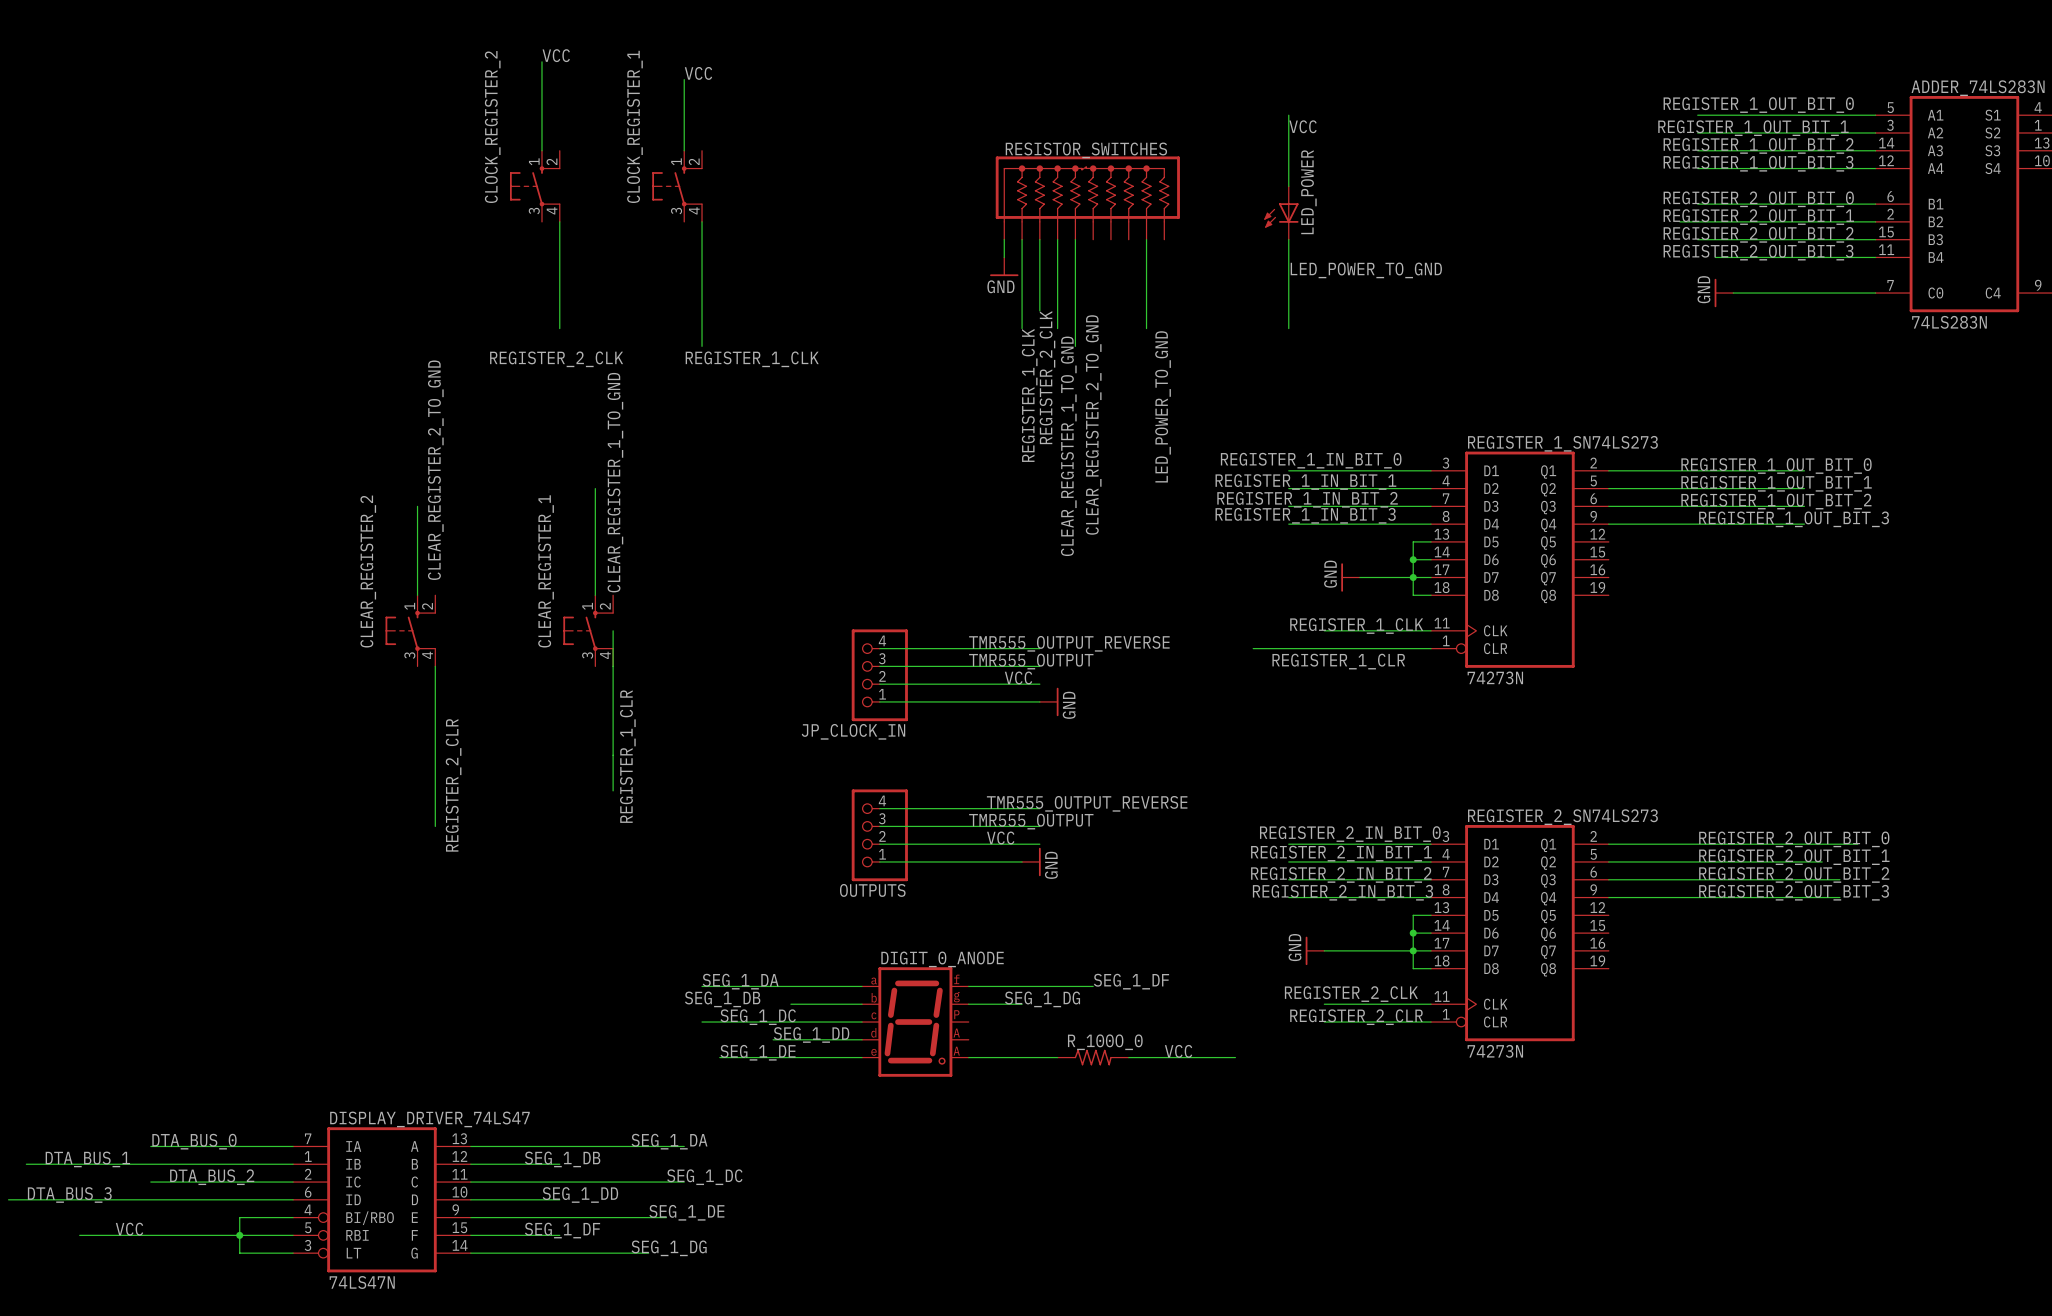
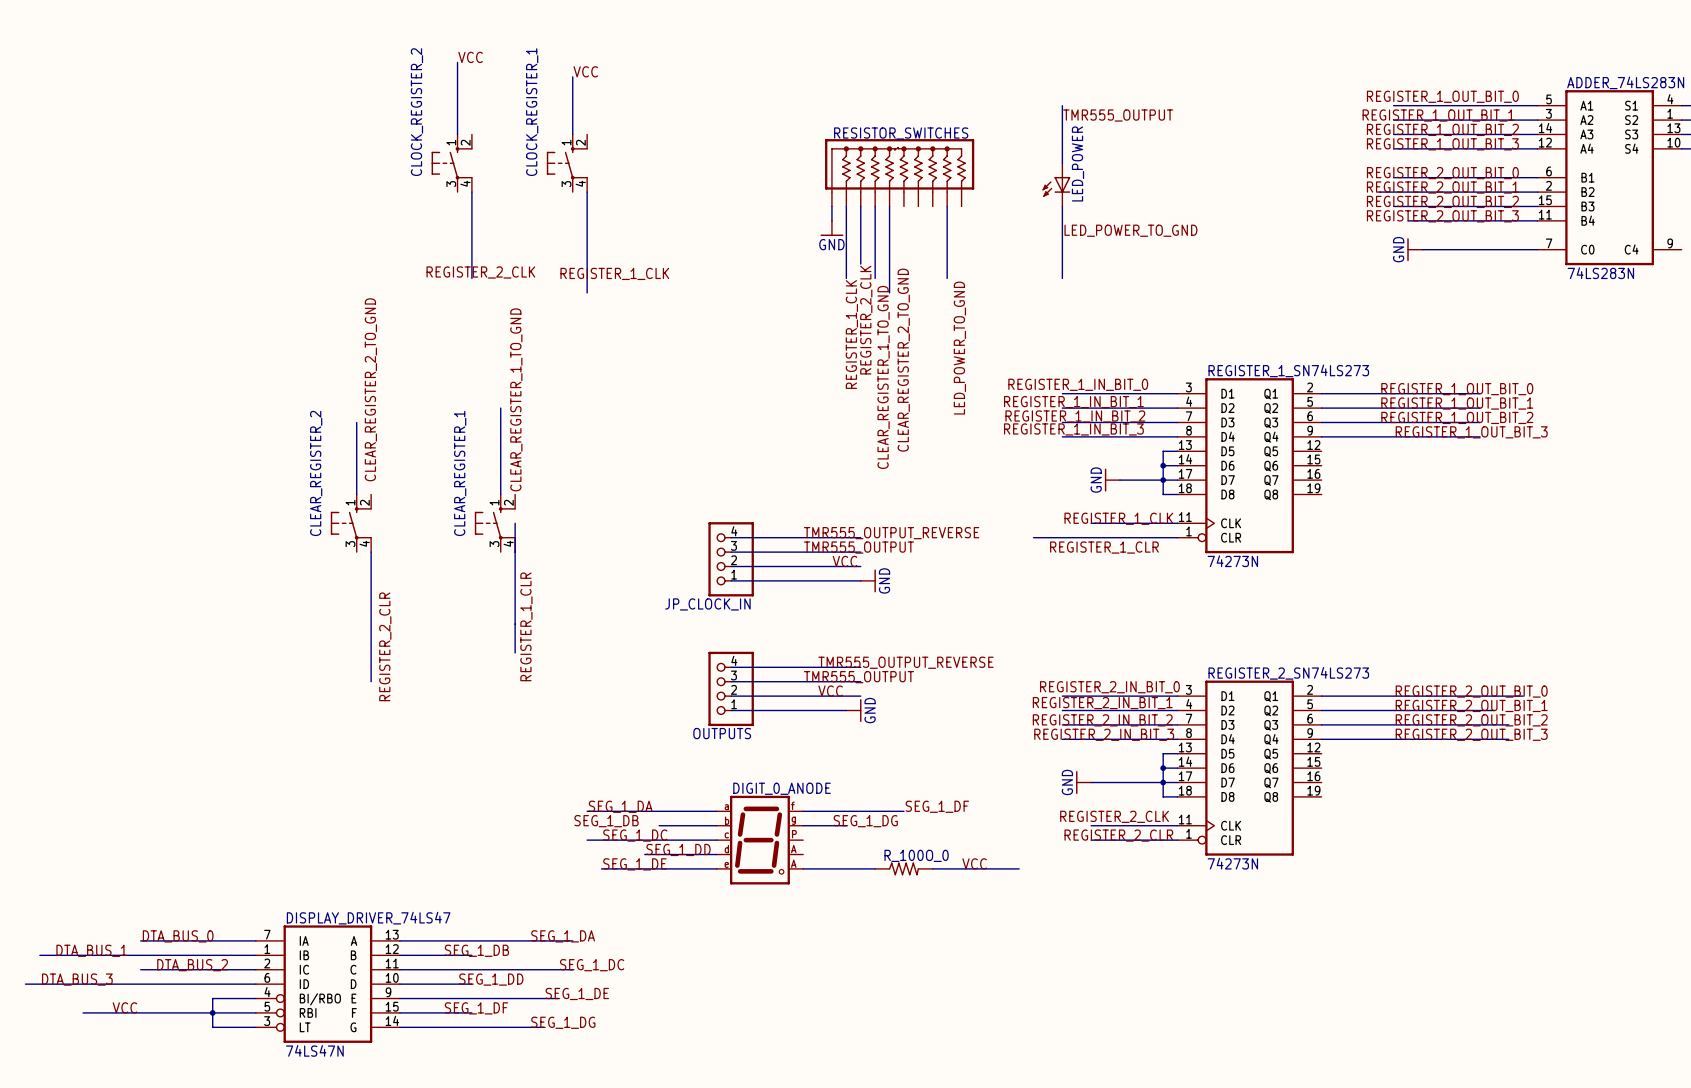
label: VCC (1303, 126) -> TMR555_OUTPUT (1118, 115)
label position: REGISTER_2_CLK (556, 359) -> REGISTER_2_CLK (480, 272)
label position: REGISTER_1_CLK (752, 359) -> REGISTER_1_CLK (614, 273)

